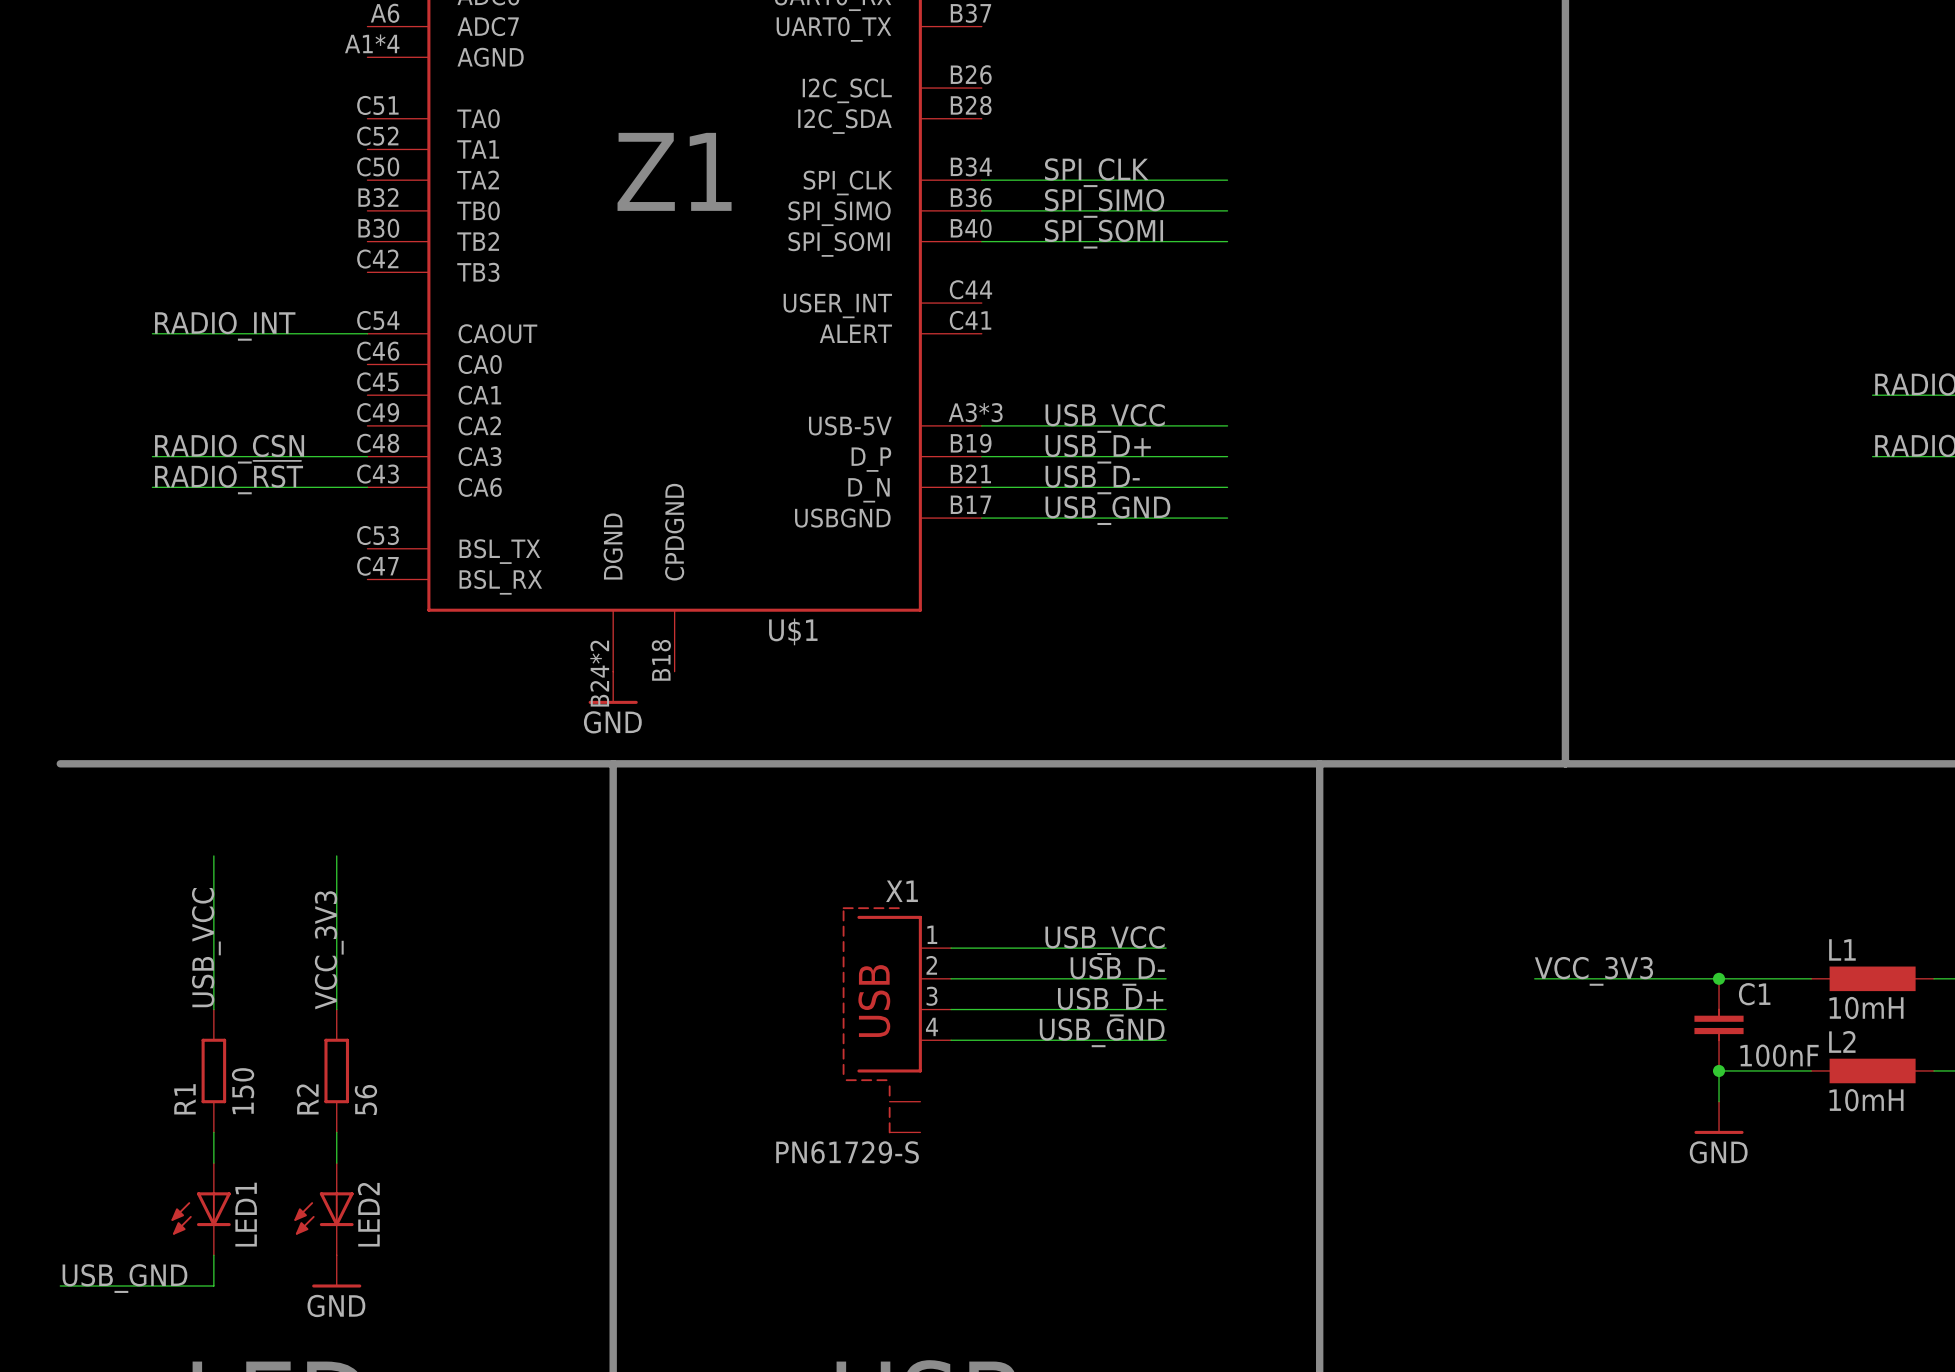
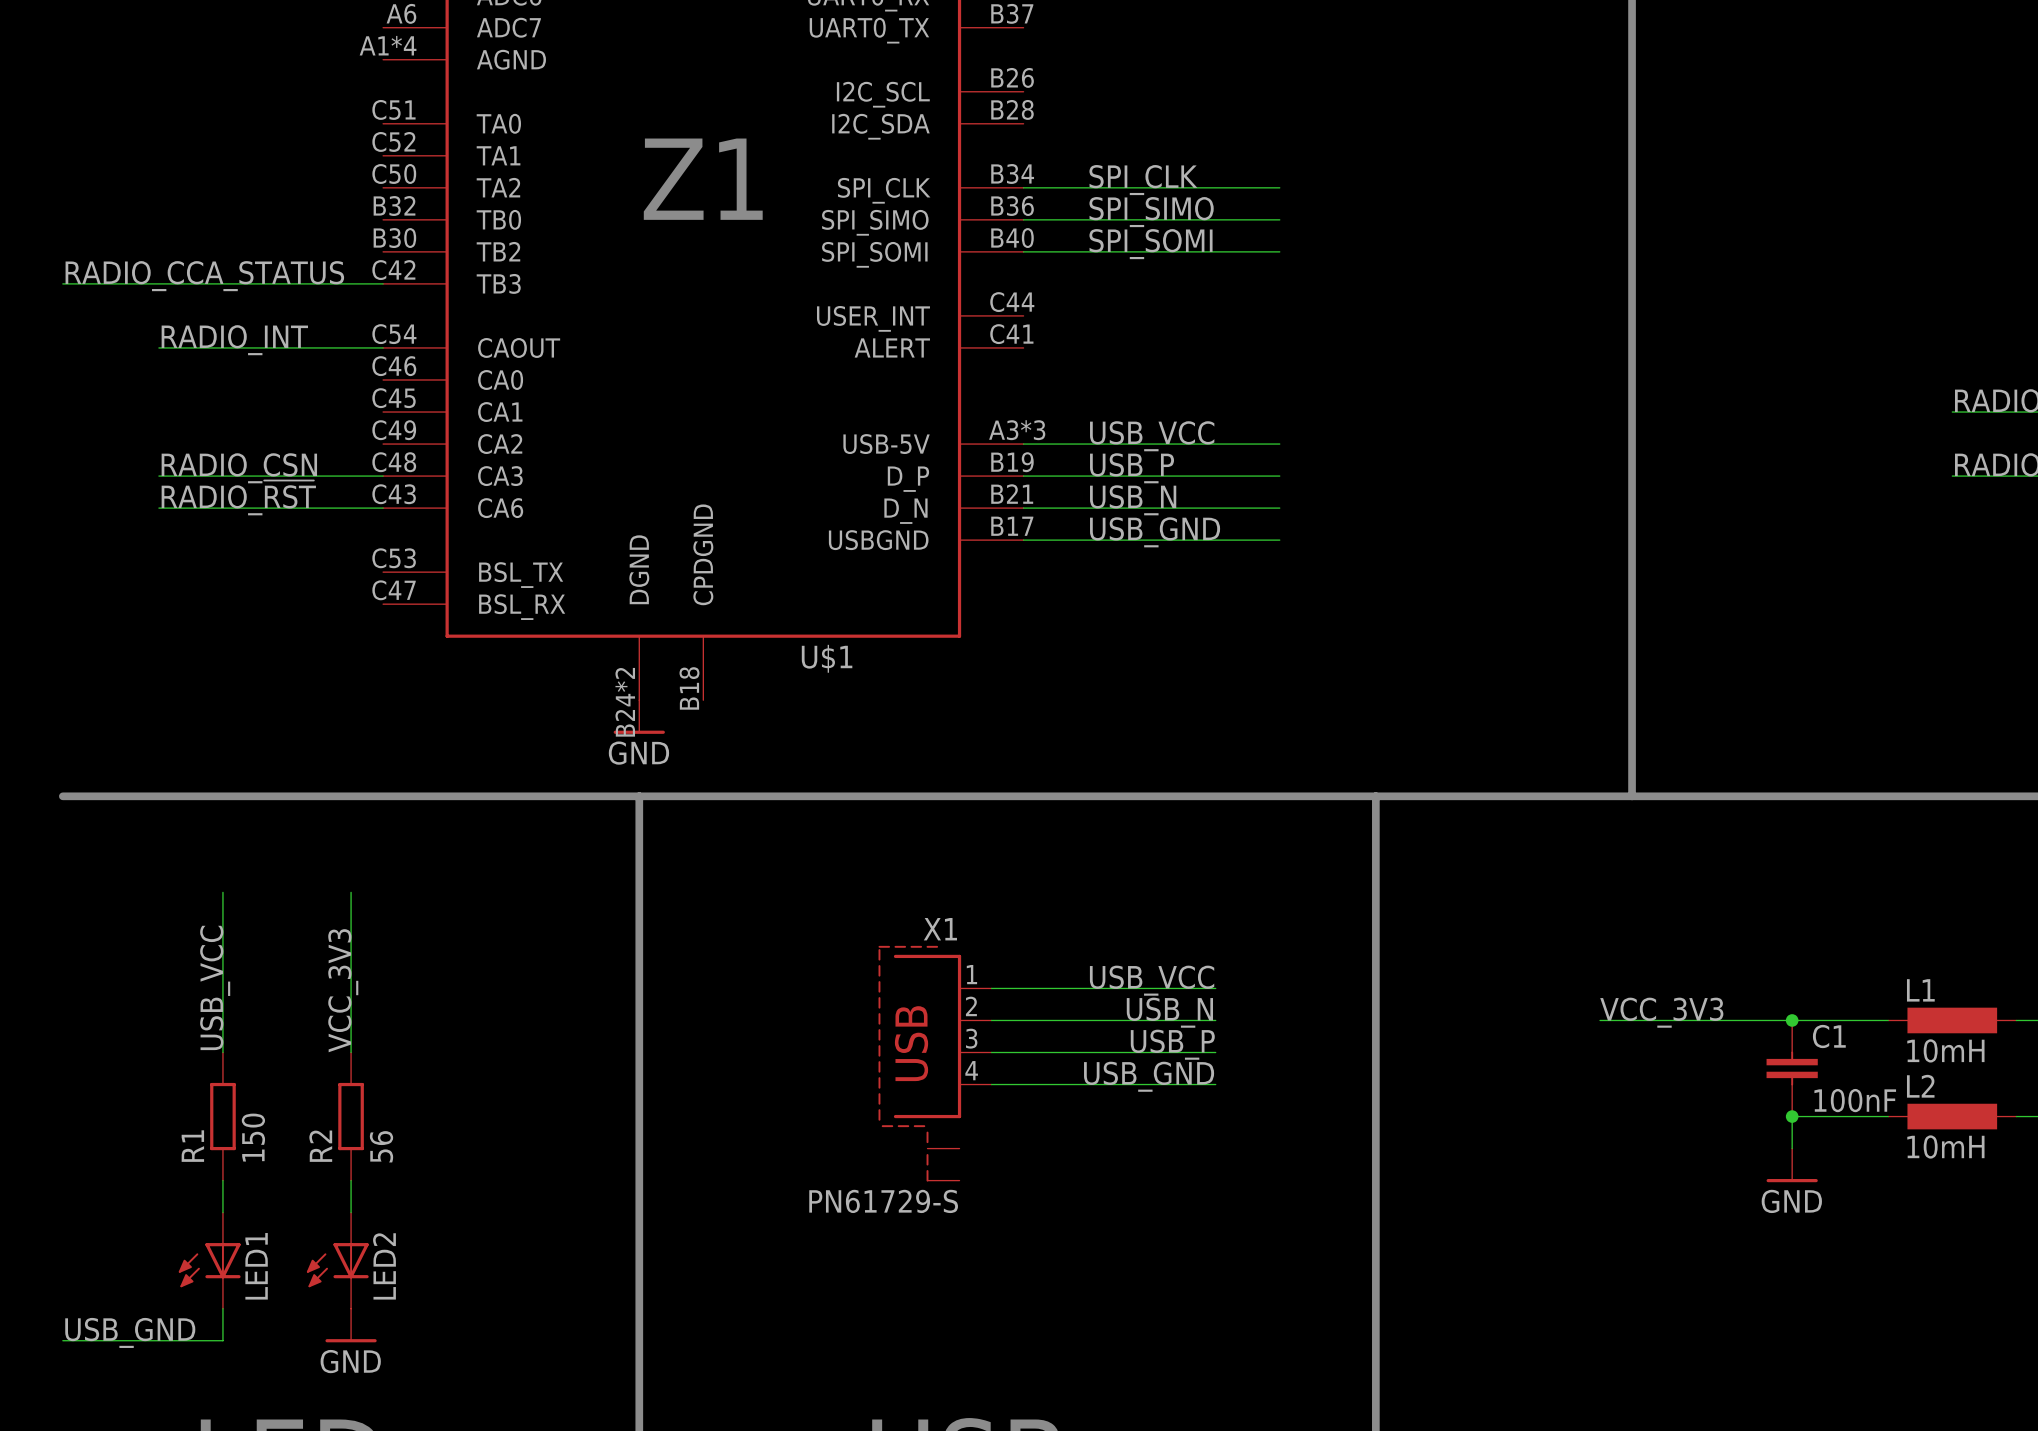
label: none -> RADIO_CCA_STATUS (204, 276)
wire: none -> (62, 283) (383, 283)
label: USB_D+ (1098, 449) -> USB_P (1132, 468)
label: USB_D- (1092, 479) -> USB_N (1133, 500)
label: USB_D- (1117, 971) -> USB_N (1169, 1012)
label: USB_D+ (1110, 1002) -> USB_P (1172, 1044)

